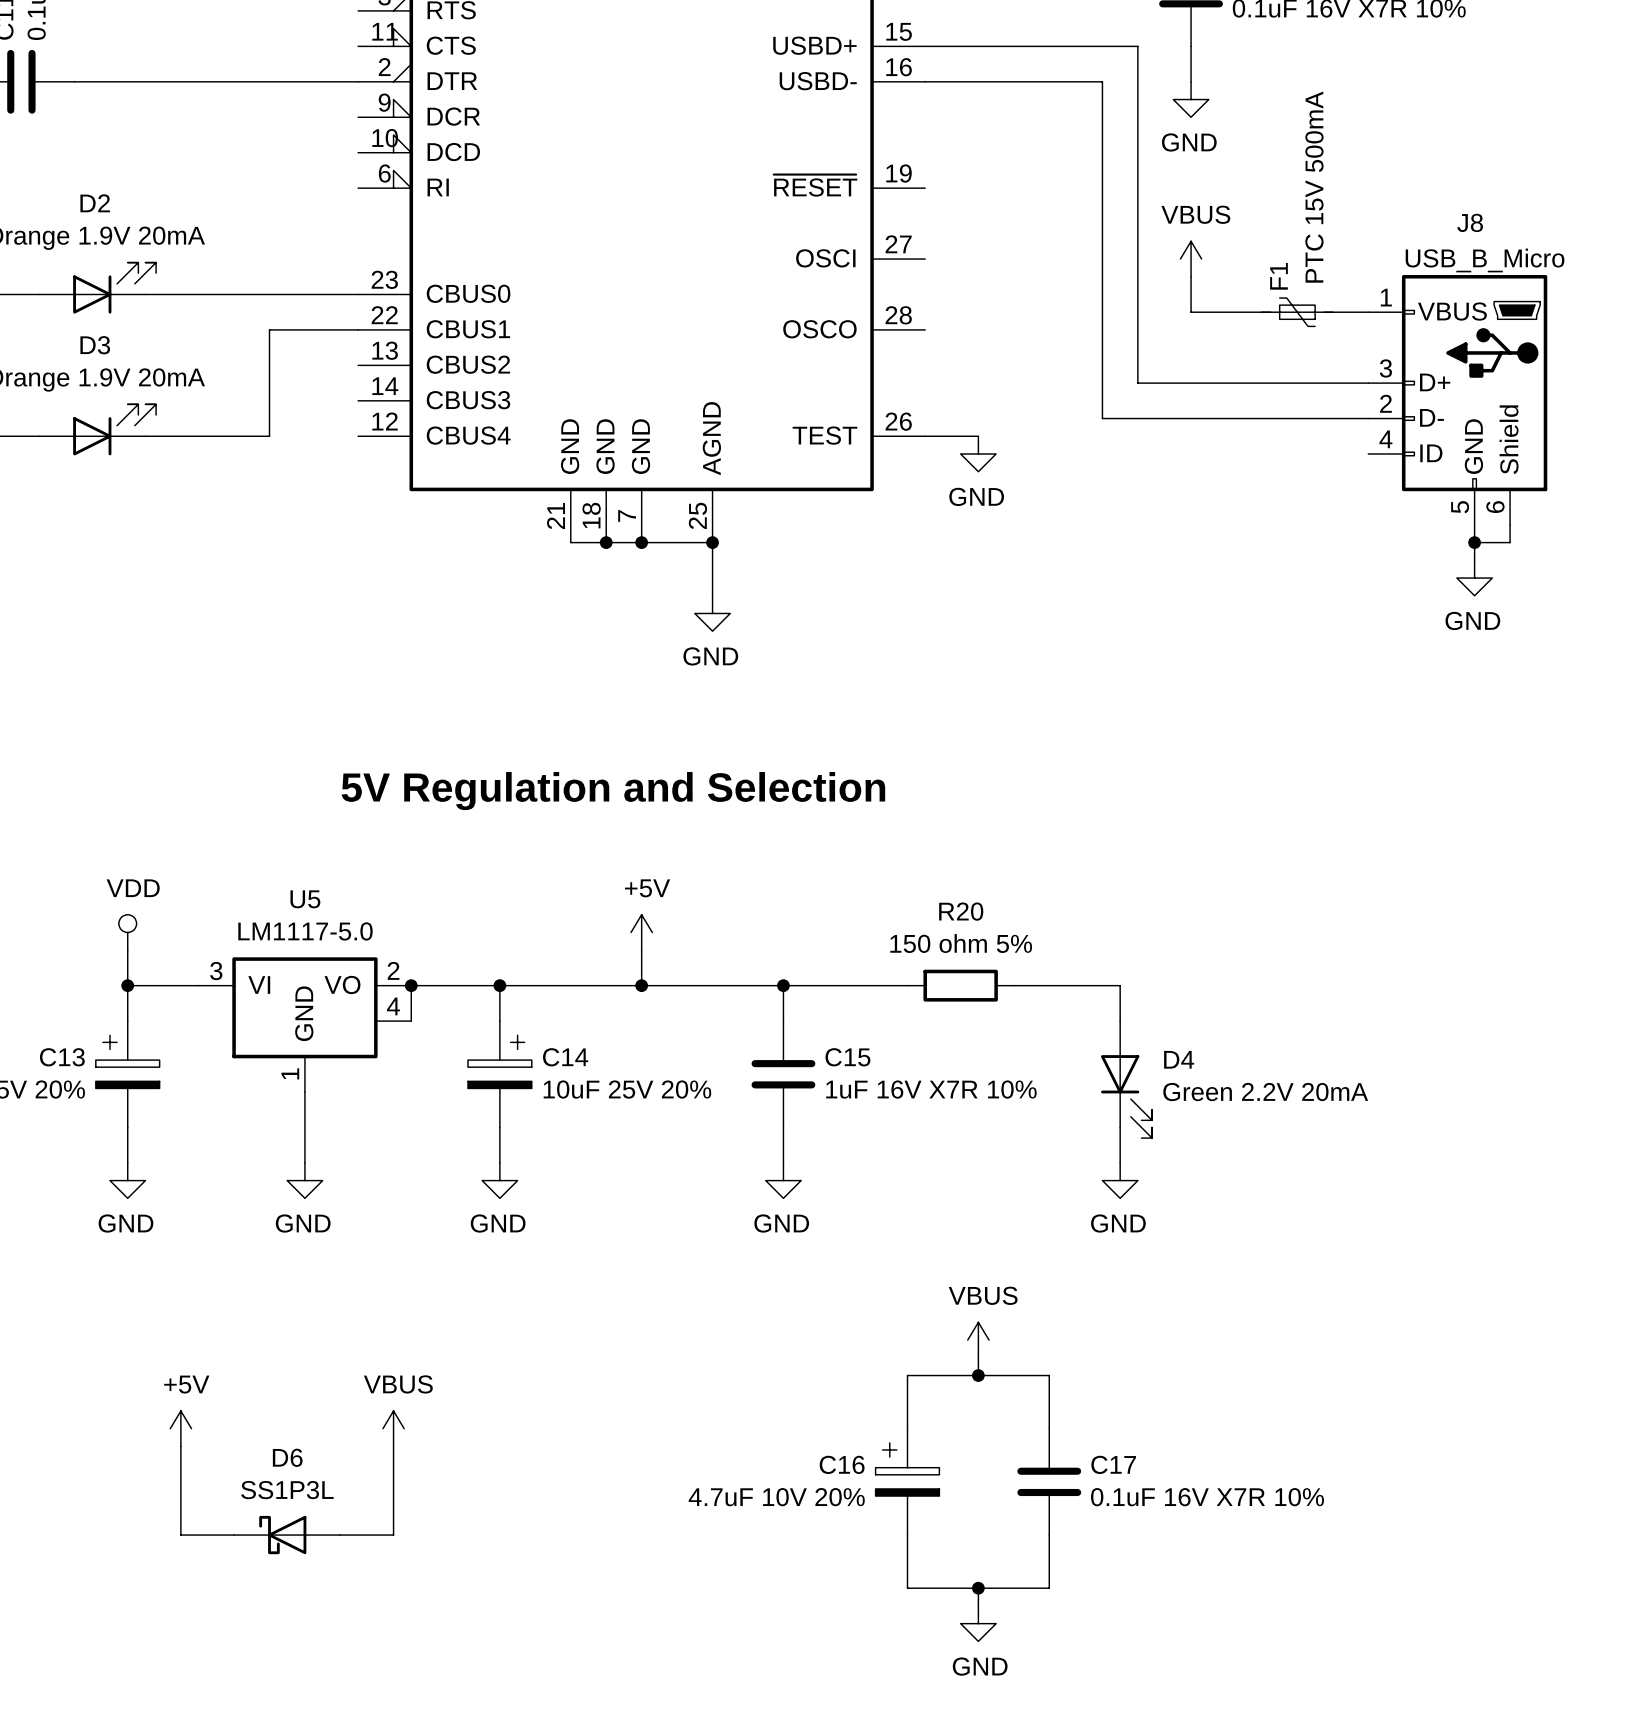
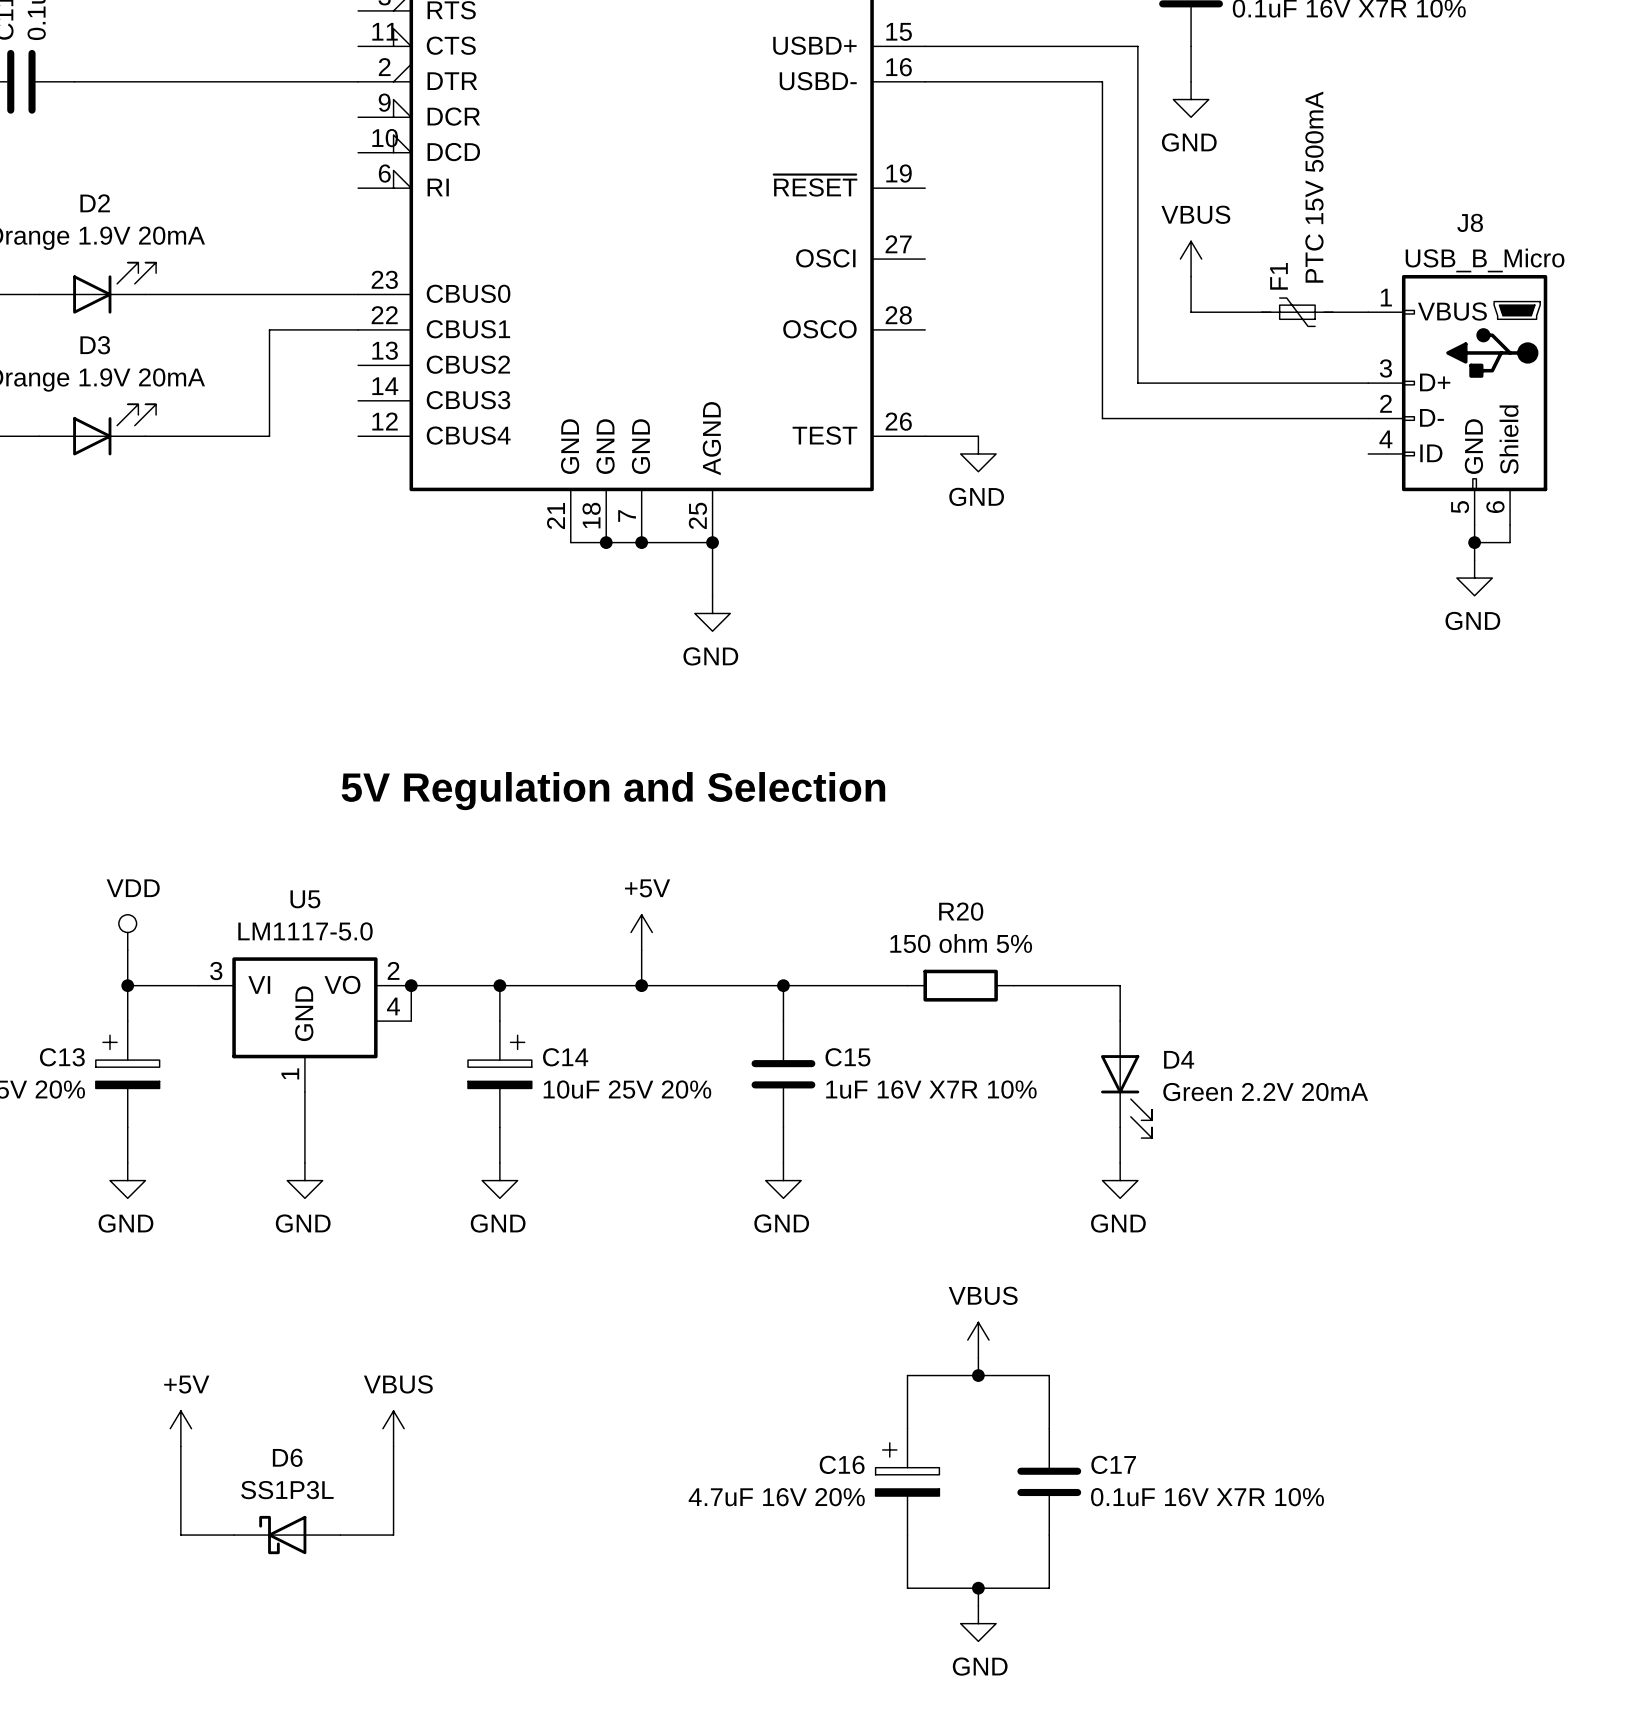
C16 value: 4.7uF 10V 20% (776, 1497) -> 4.7uF 16V 20% (776, 1497)

